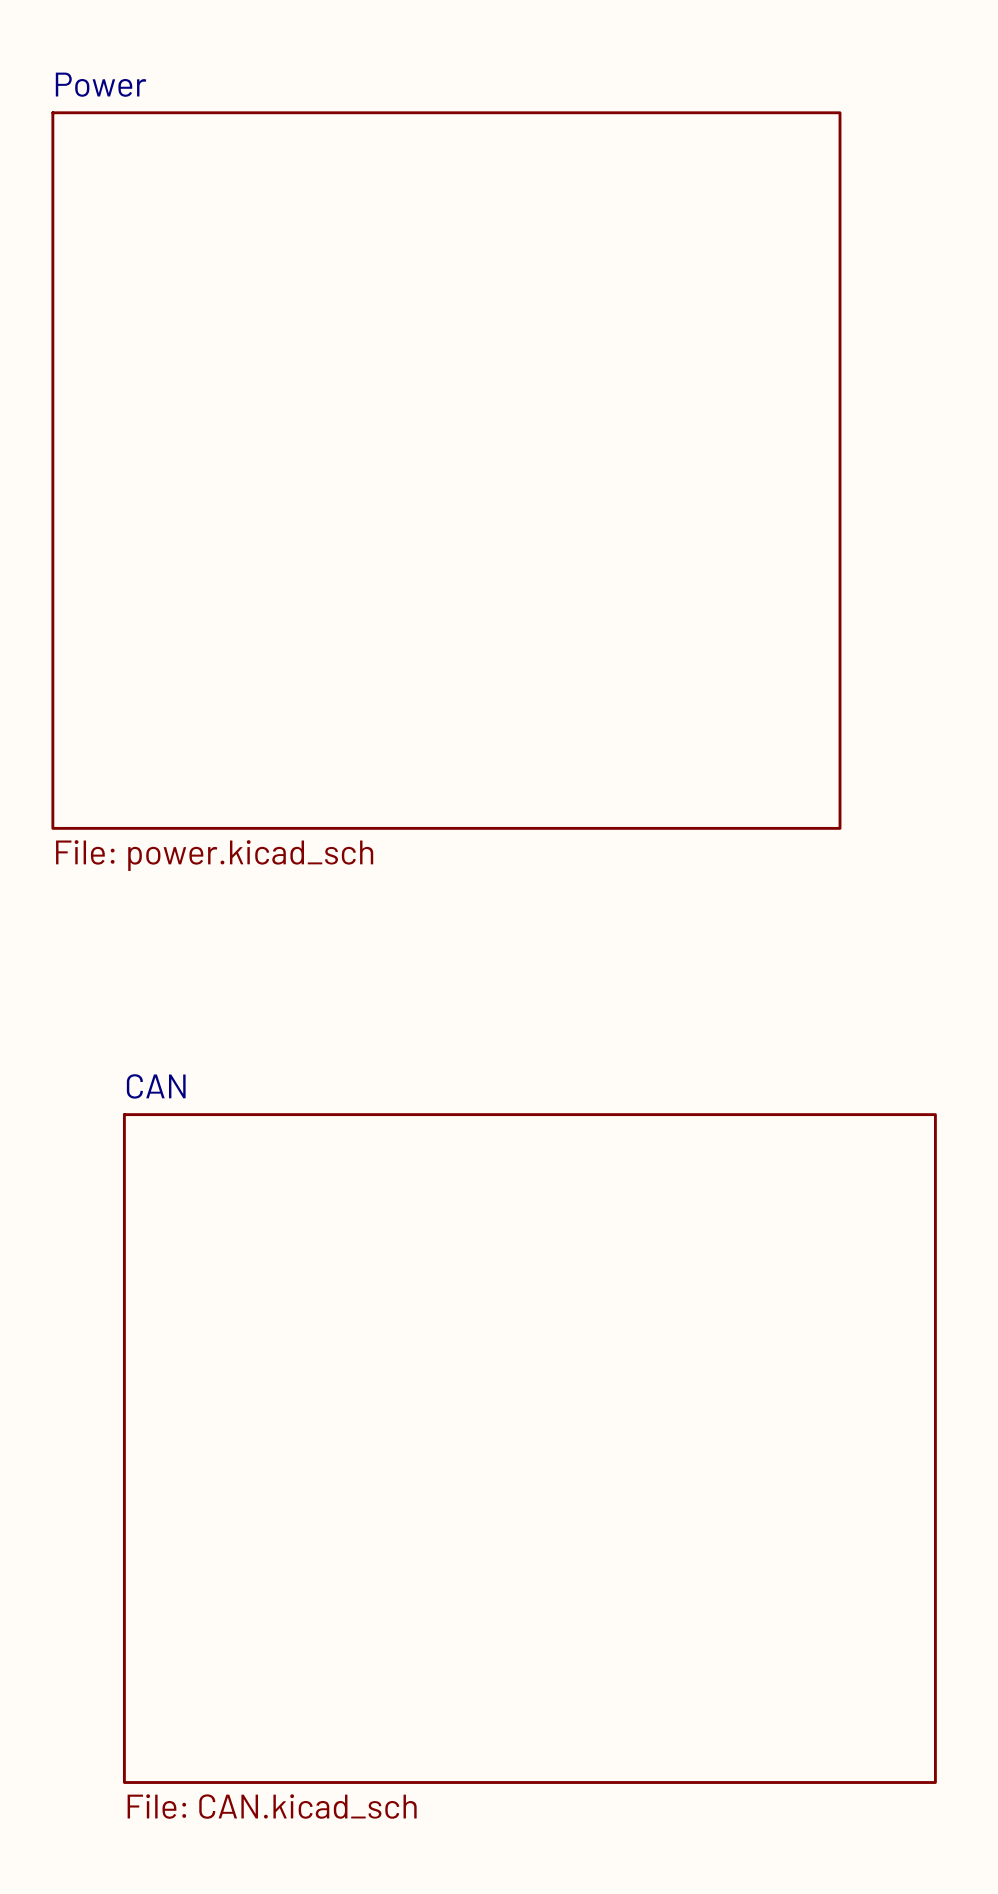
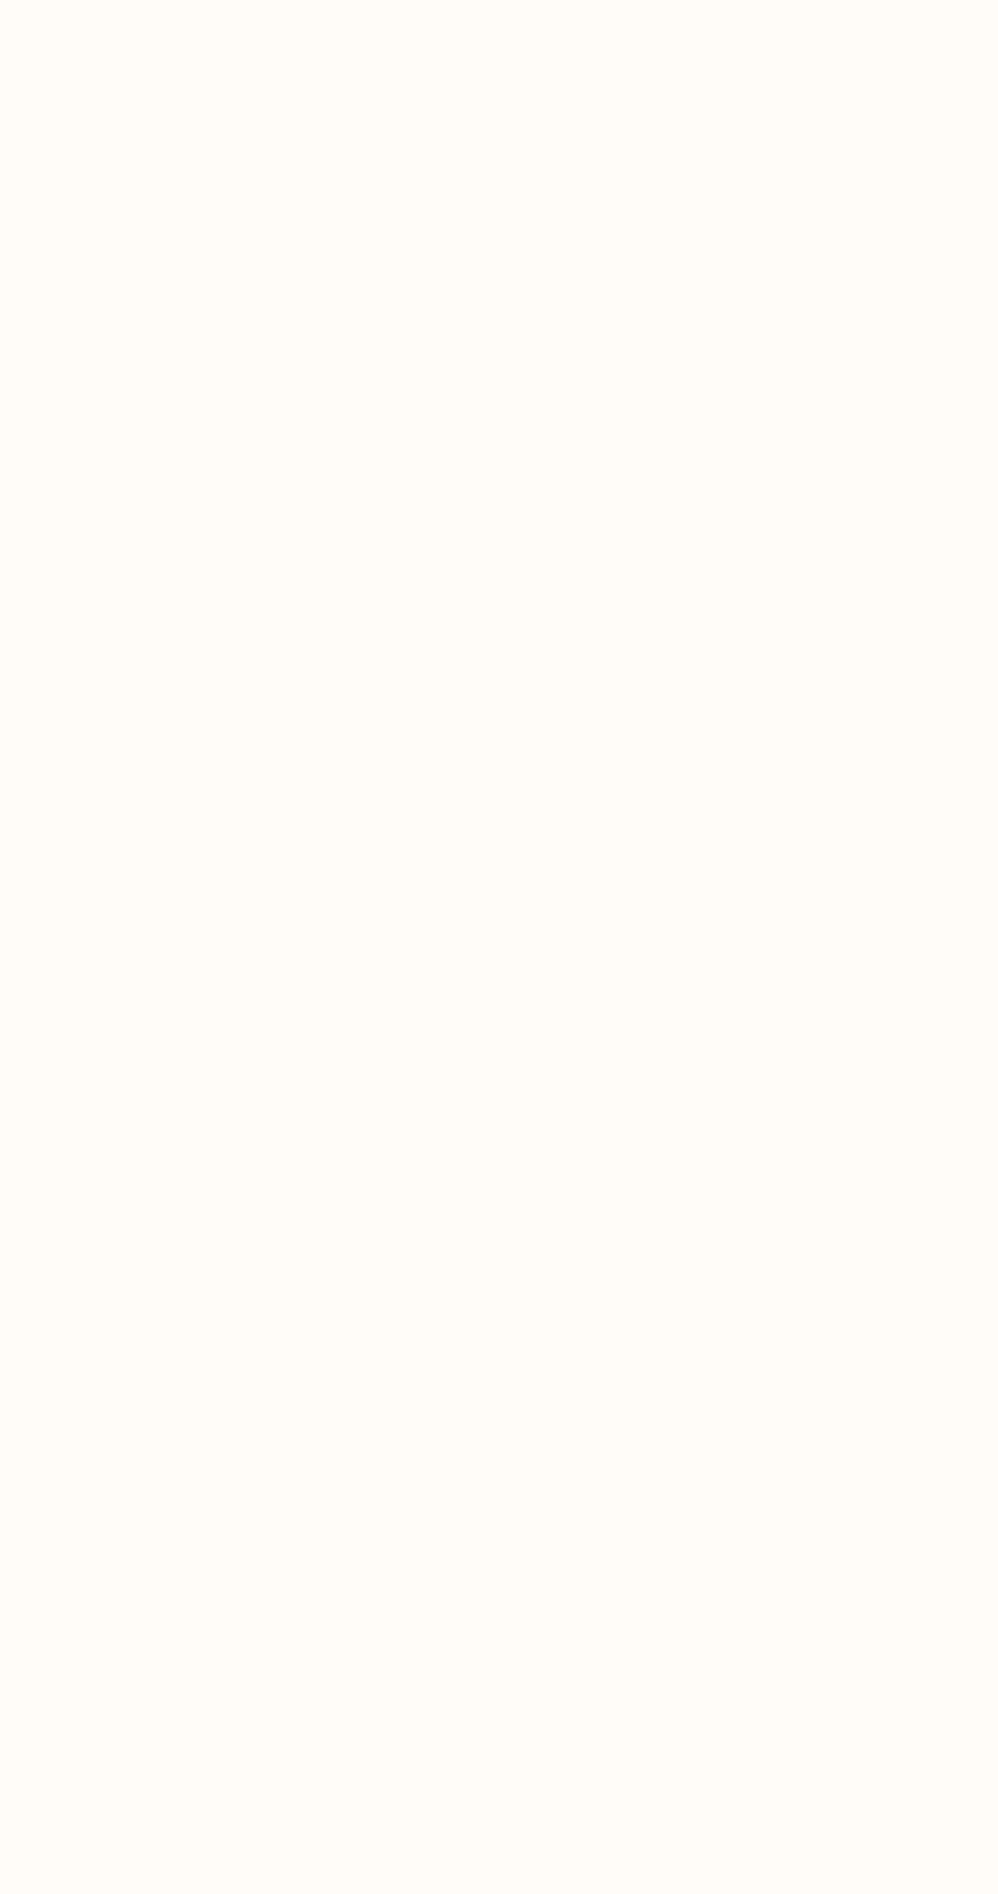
sheet Power: File: power.kicad_sch (446, 470) -> none
sheet CAN: File: CAN.kicad_sch (529, 1448) -> none

